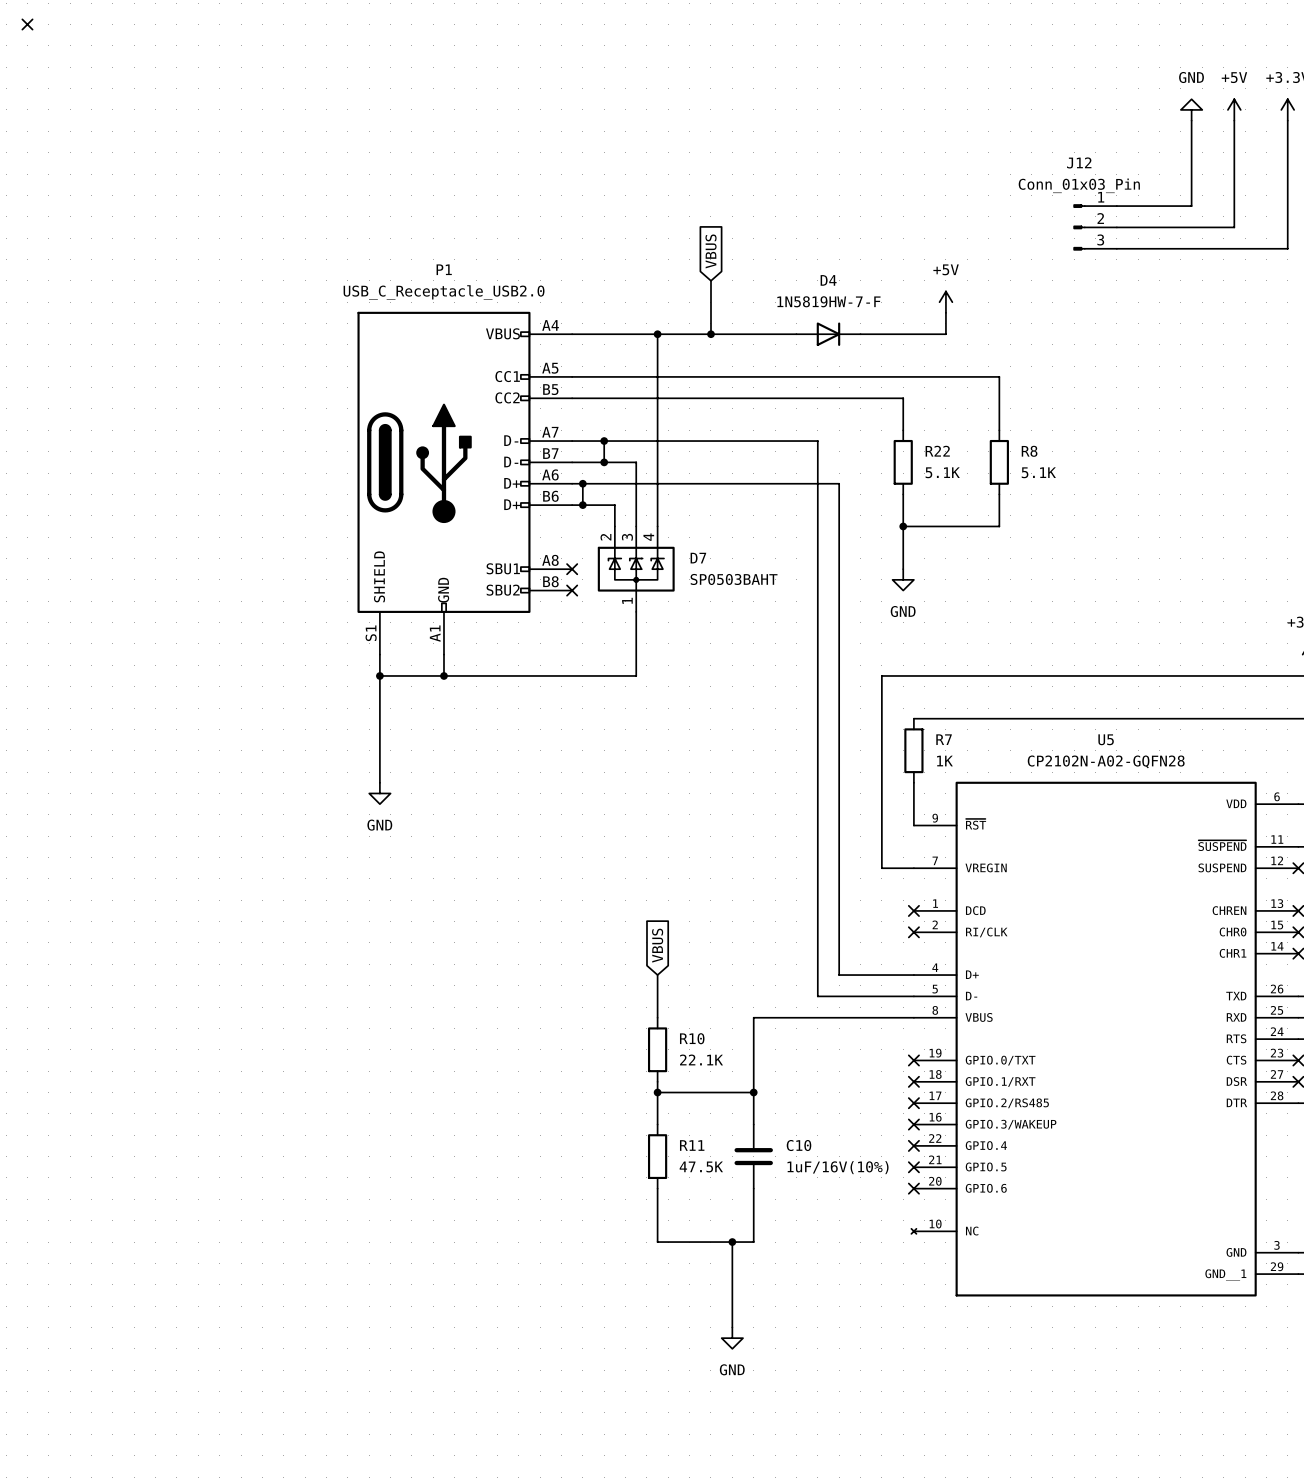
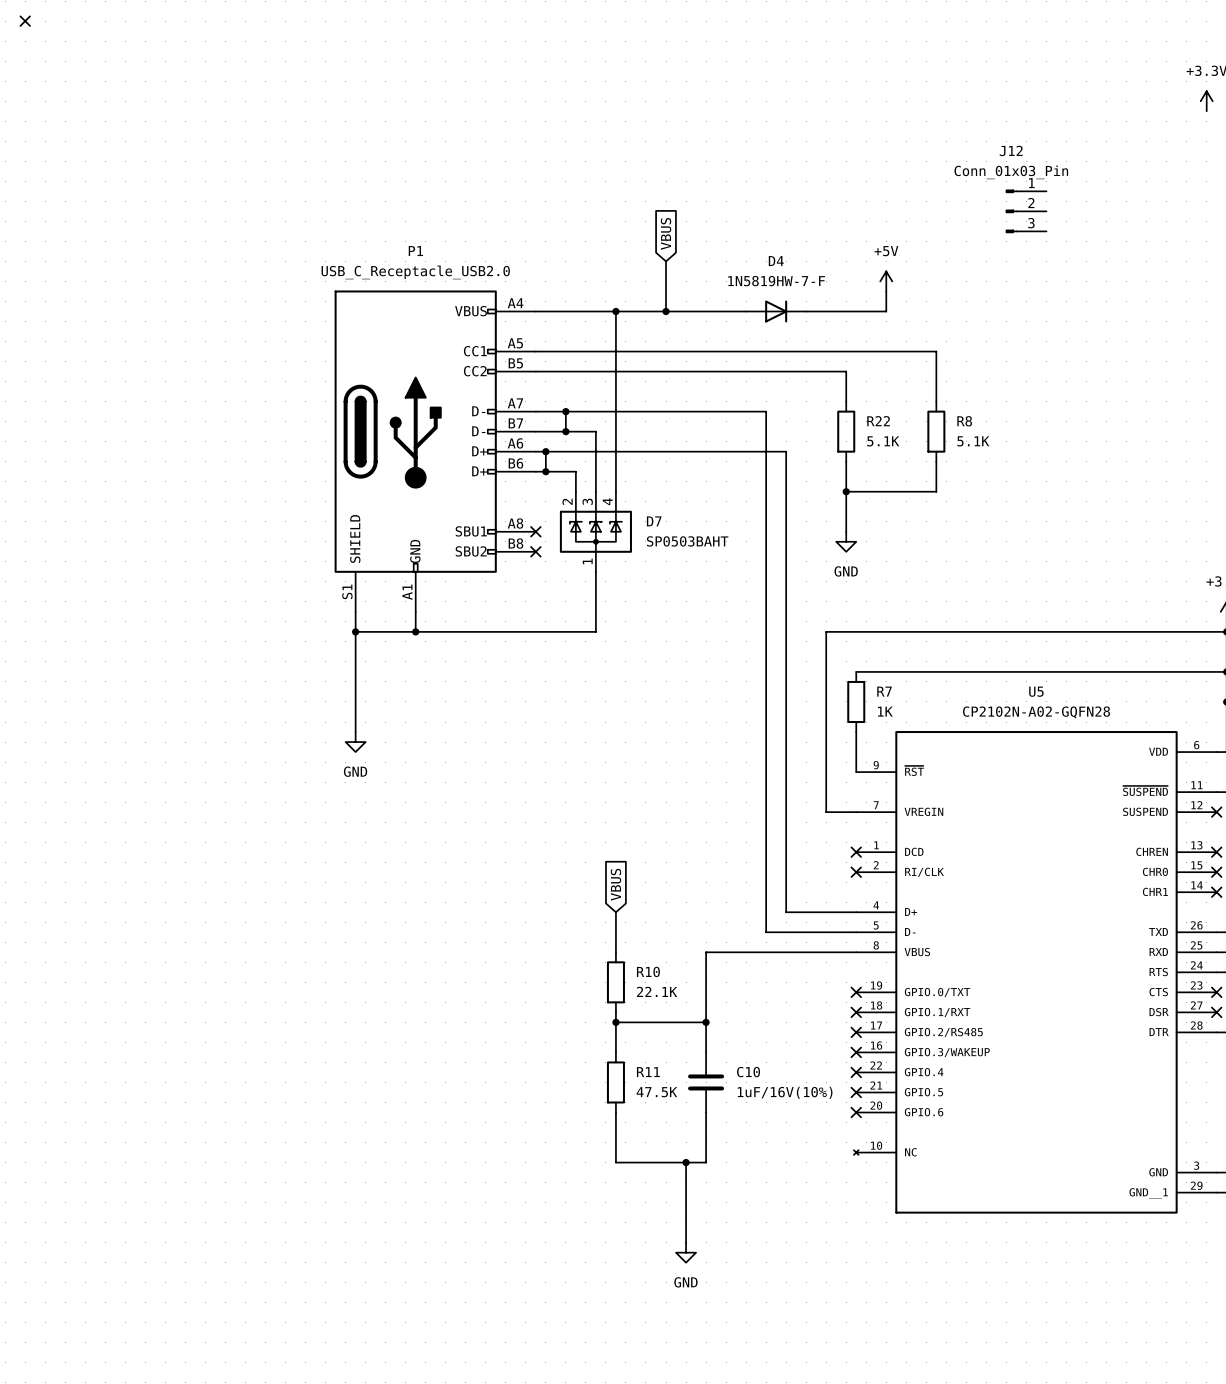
power symbol: GND (1191, 109) -> none
power symbol: +5V (1234, 109) -> none
wire: (1191, 120) (1191, 206) (1116, 206) -> none
wire: (1234, 120) (1234, 227) (1116, 227) -> none
wire: (1287, 120) (1287, 248) (1116, 248) -> none

